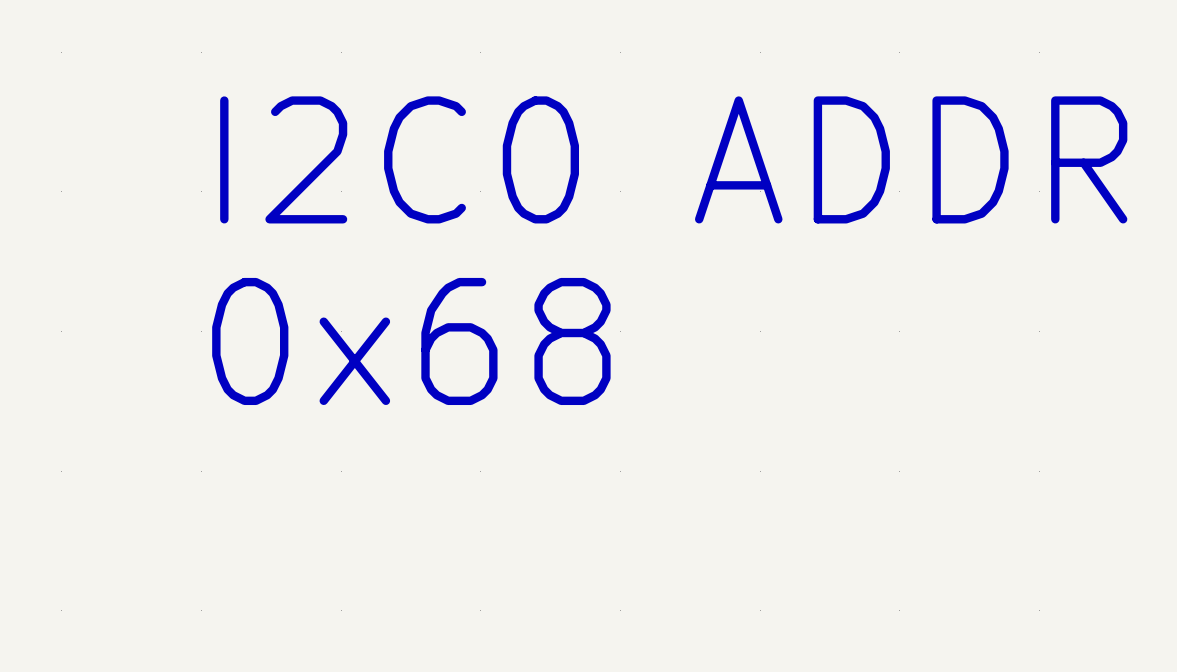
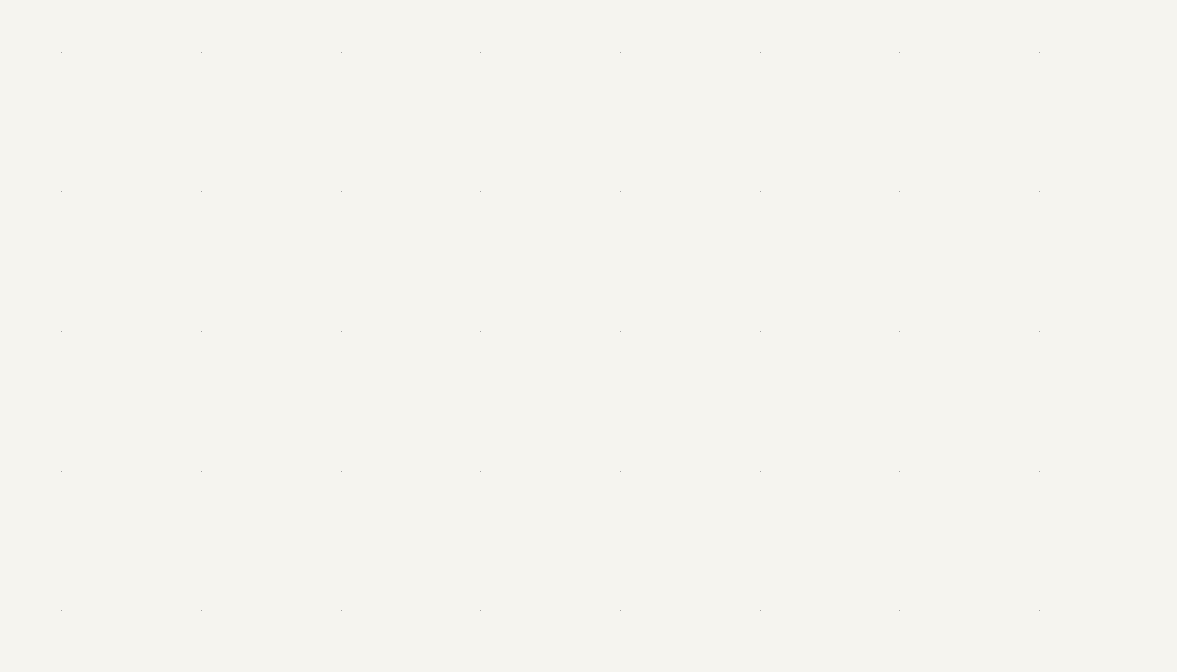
text: I2C0 ADDR (673, 159) -> none
text: 0x68 (411, 341) -> none

